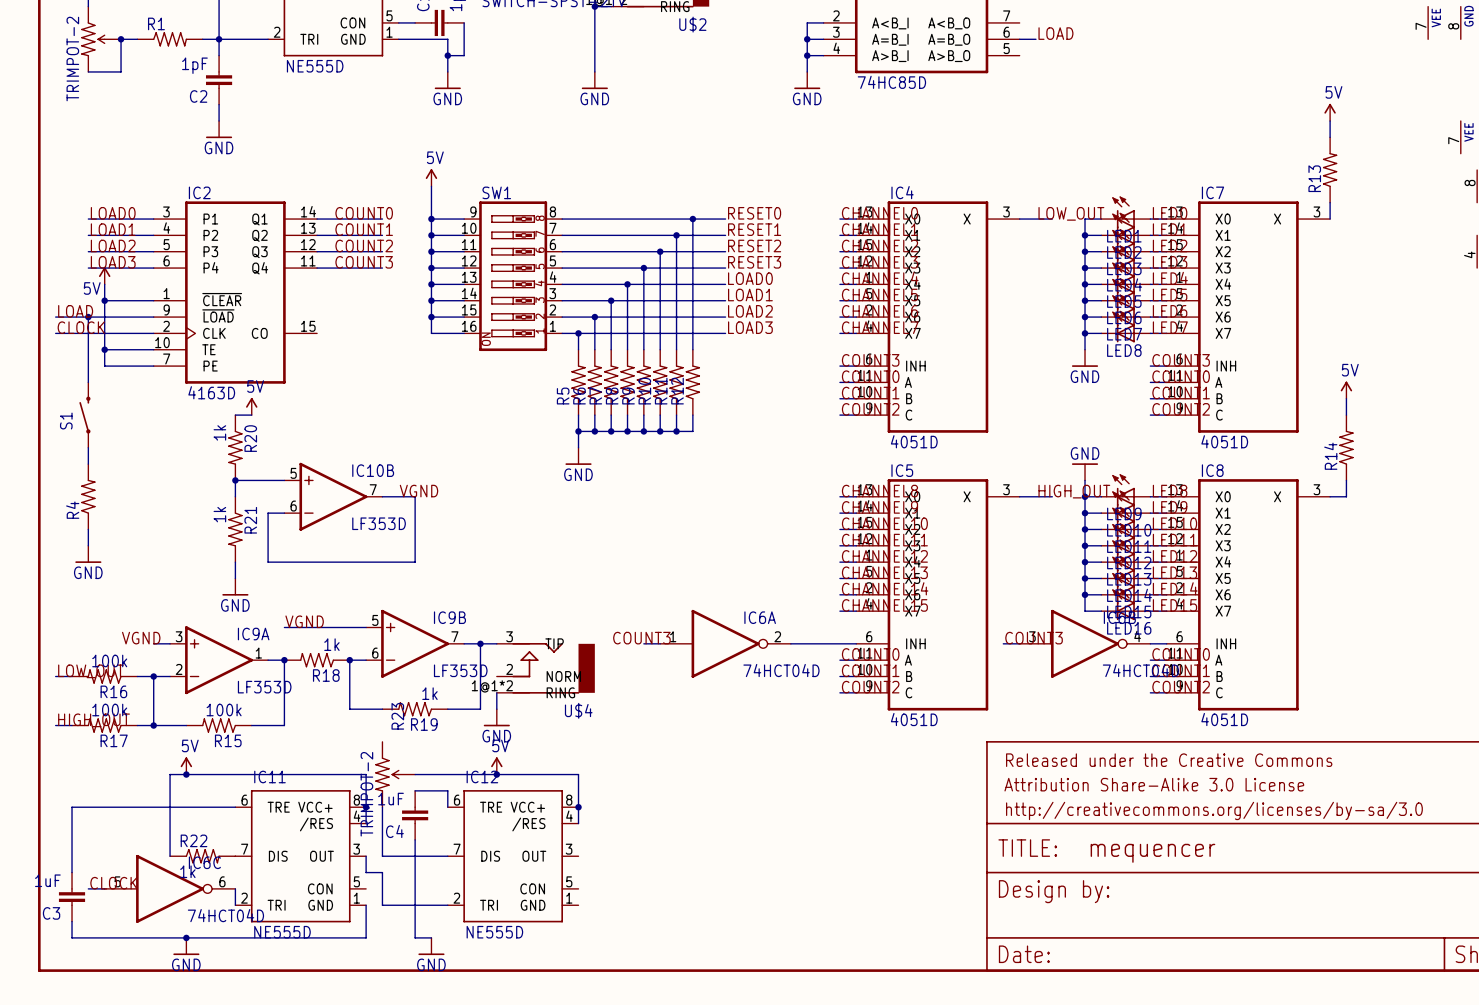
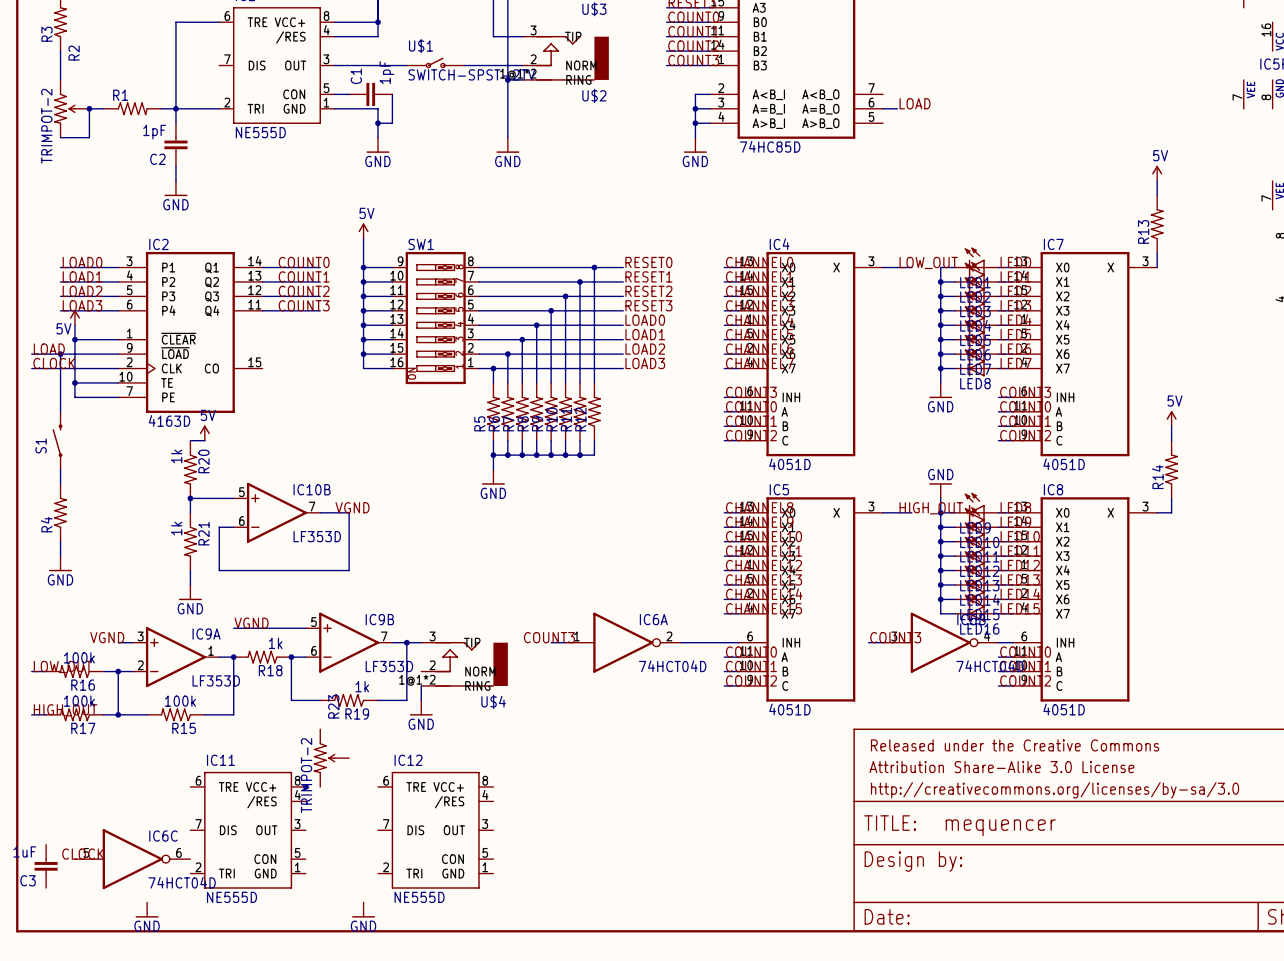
power symbol: 5V (186, 765) -> none
power symbol: 5V (496, 765) -> none
junction: (186, 774) -> none
wire: (415, 774) (578, 774) (578, 823) -> none
junction: (496, 774) -> none
wire: (415, 790) (447, 790) (447, 807) -> none
wire: (235, 807) (72, 807) (72, 872) -> none
wire: (382, 807) (382, 856) (447, 856) -> none
junction: (578, 807) -> none
C4: 1uF (415, 815) -> none
wire: (366, 823) (366, 774) (170, 774) (170, 856) -> none
wire: (415, 839) (415, 937) (431, 937) -> none
R22: 1k (202, 856) -> none
wire: (366, 856) (366, 872) (382, 872) (382, 905) (447, 905) -> none
wire: (88, 888) (104, 888) -> none
wire: (235, 888) (235, 905) -> none
wire: (366, 905) (366, 937) (72, 937) (72, 921) -> none
junction: (186, 937) -> none

